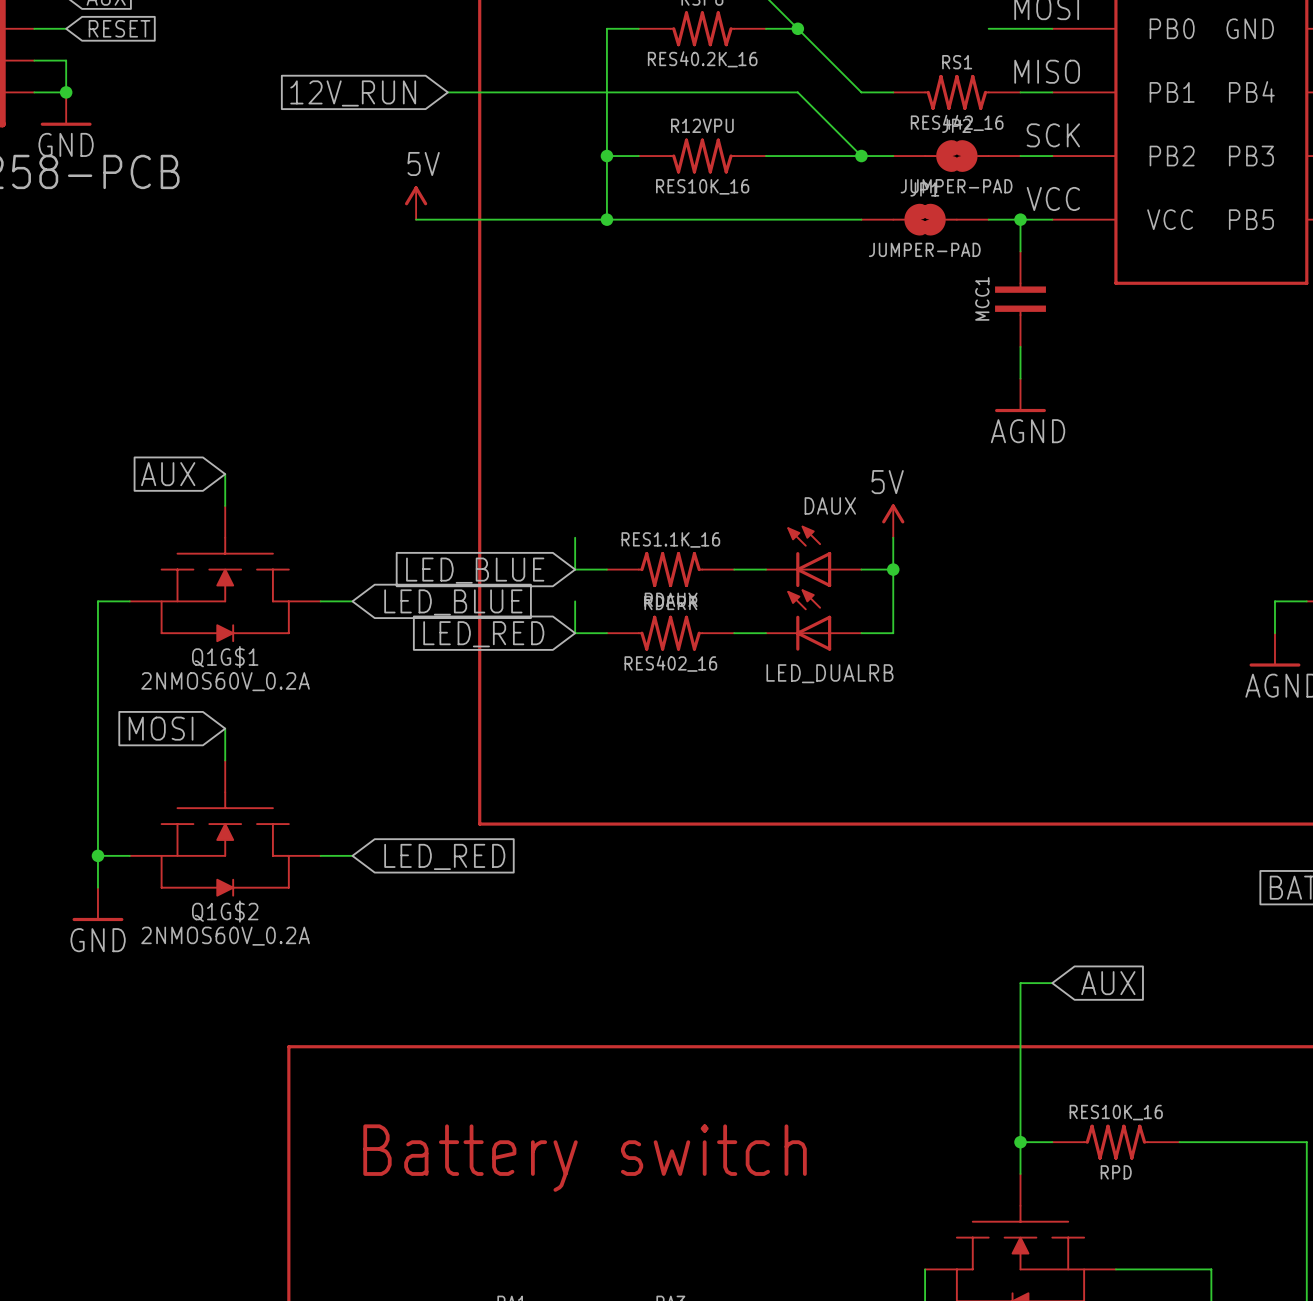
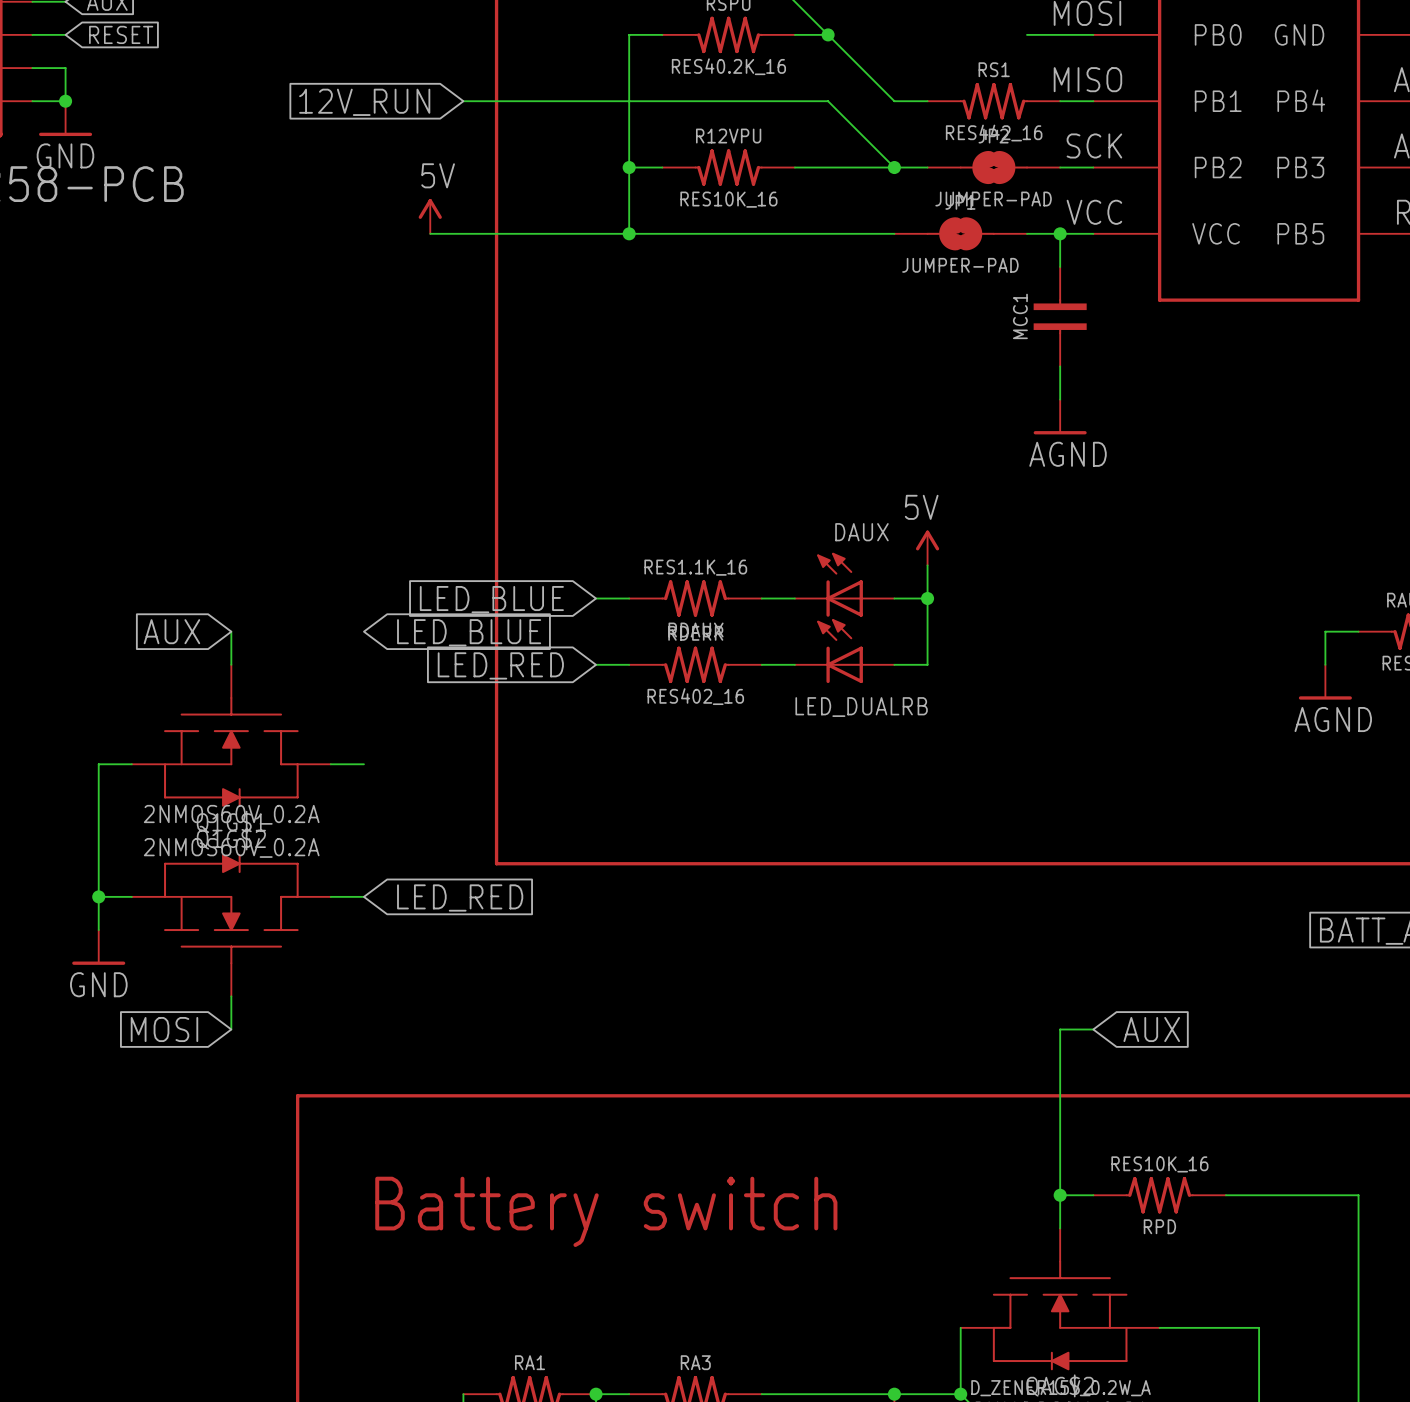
global label position: AUX (168, 474) -> AUX (171, 631)
wire: (225, 474) (225, 505) -> (231, 631) (231, 664)
wire: (575, 537) (575, 569) -> none
Q1G$1 position: (225, 574) -> (231, 735)
wire: (129, 601) (97, 601) (97, 728) -> (131, 764) (98, 764)
wire: (320, 601) (352, 601) -> (330, 764) (363, 764)
wire: (575, 601) (575, 633) -> none
global label position: MOSI (161, 728) -> MOSI (164, 1029)
wire: (225, 728) (225, 760) -> (231, 996) (231, 1029)
Q1G$2 flip: as is (225, 843) -> up-down (231, 909)

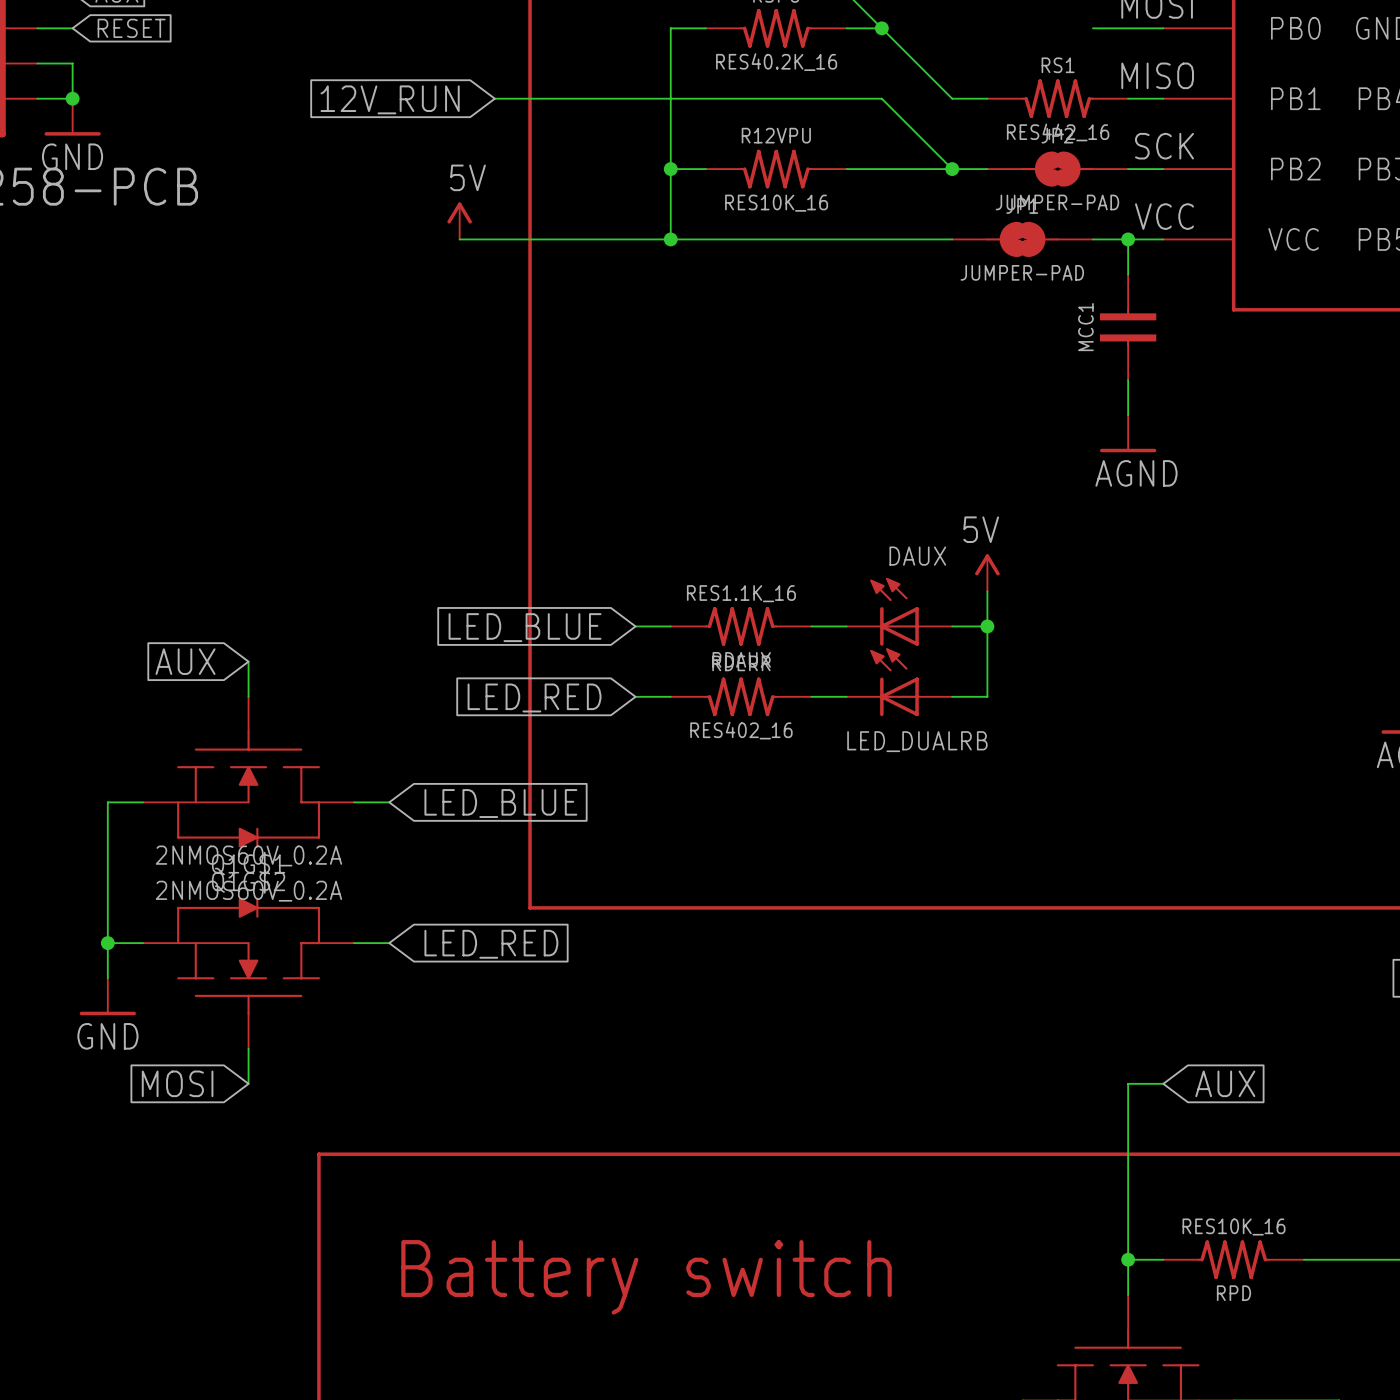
global label position: LED_BLUE (469, 632) -> LED_BLUE (500, 803)

